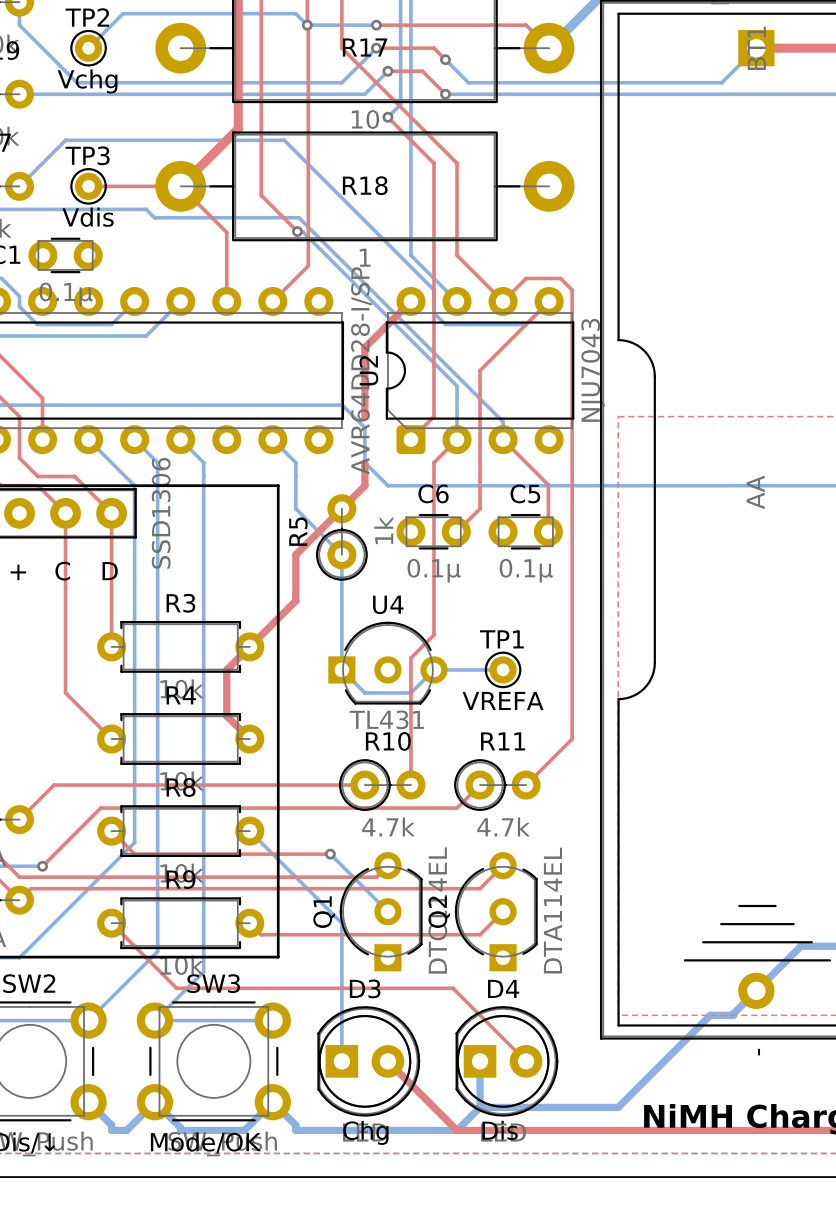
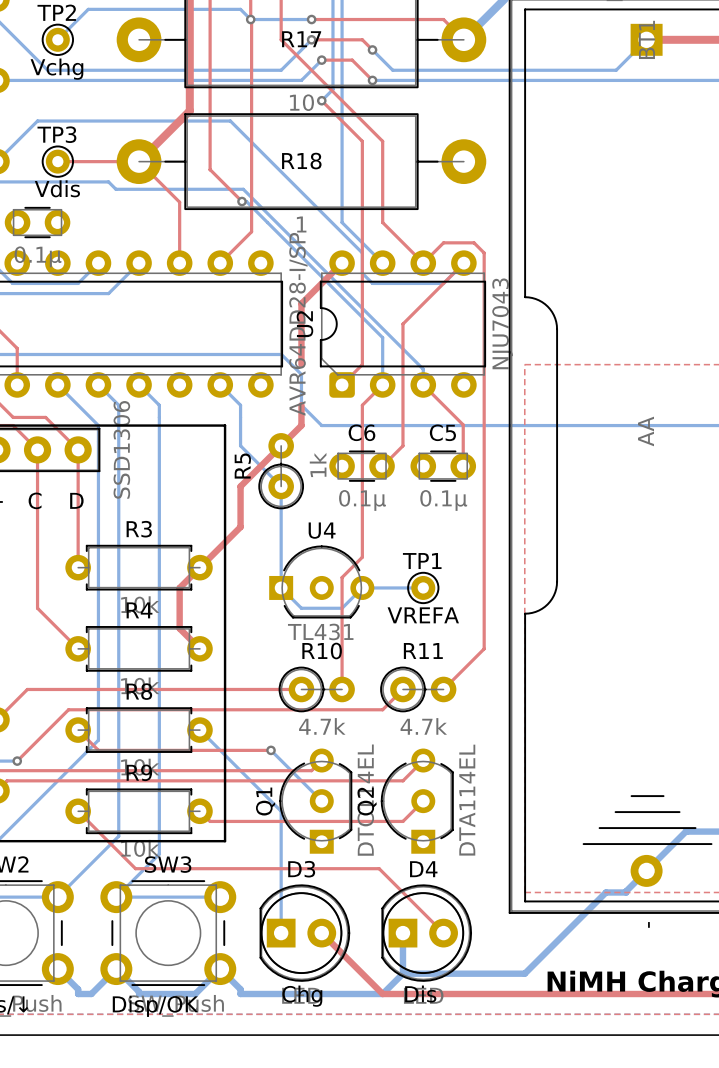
text: Mode/OK (205, 1142) -> Disp/OK (155, 1006)

